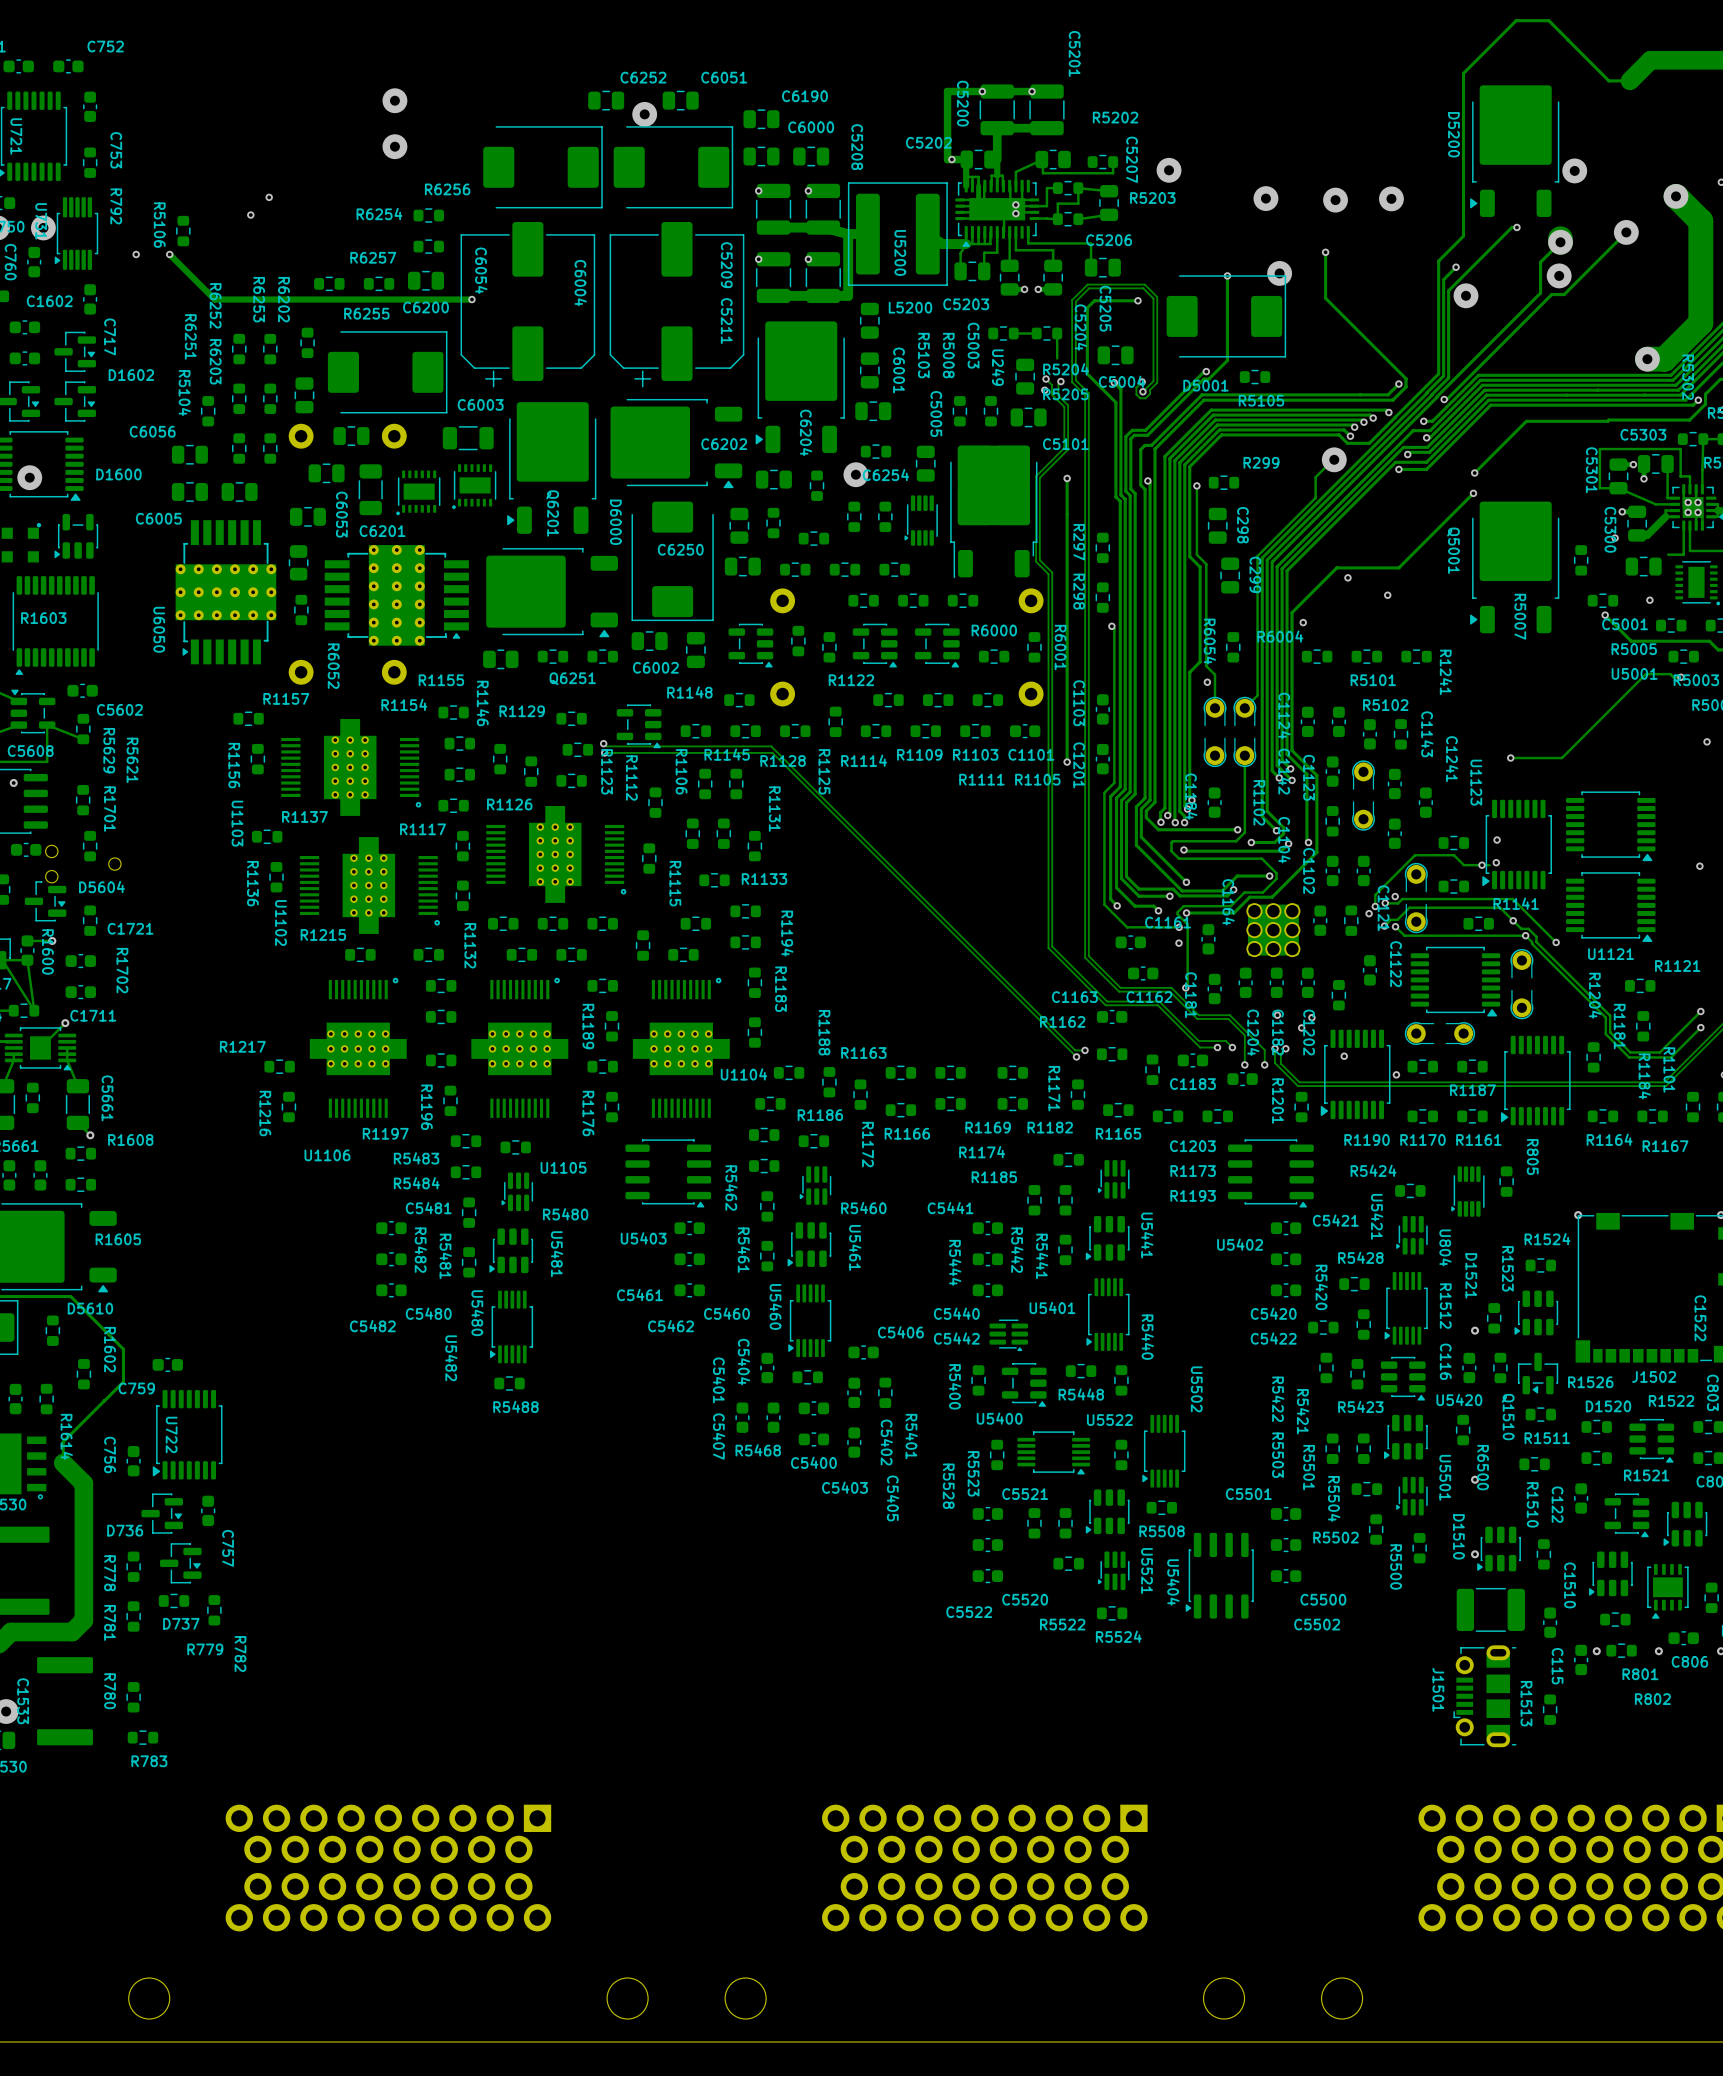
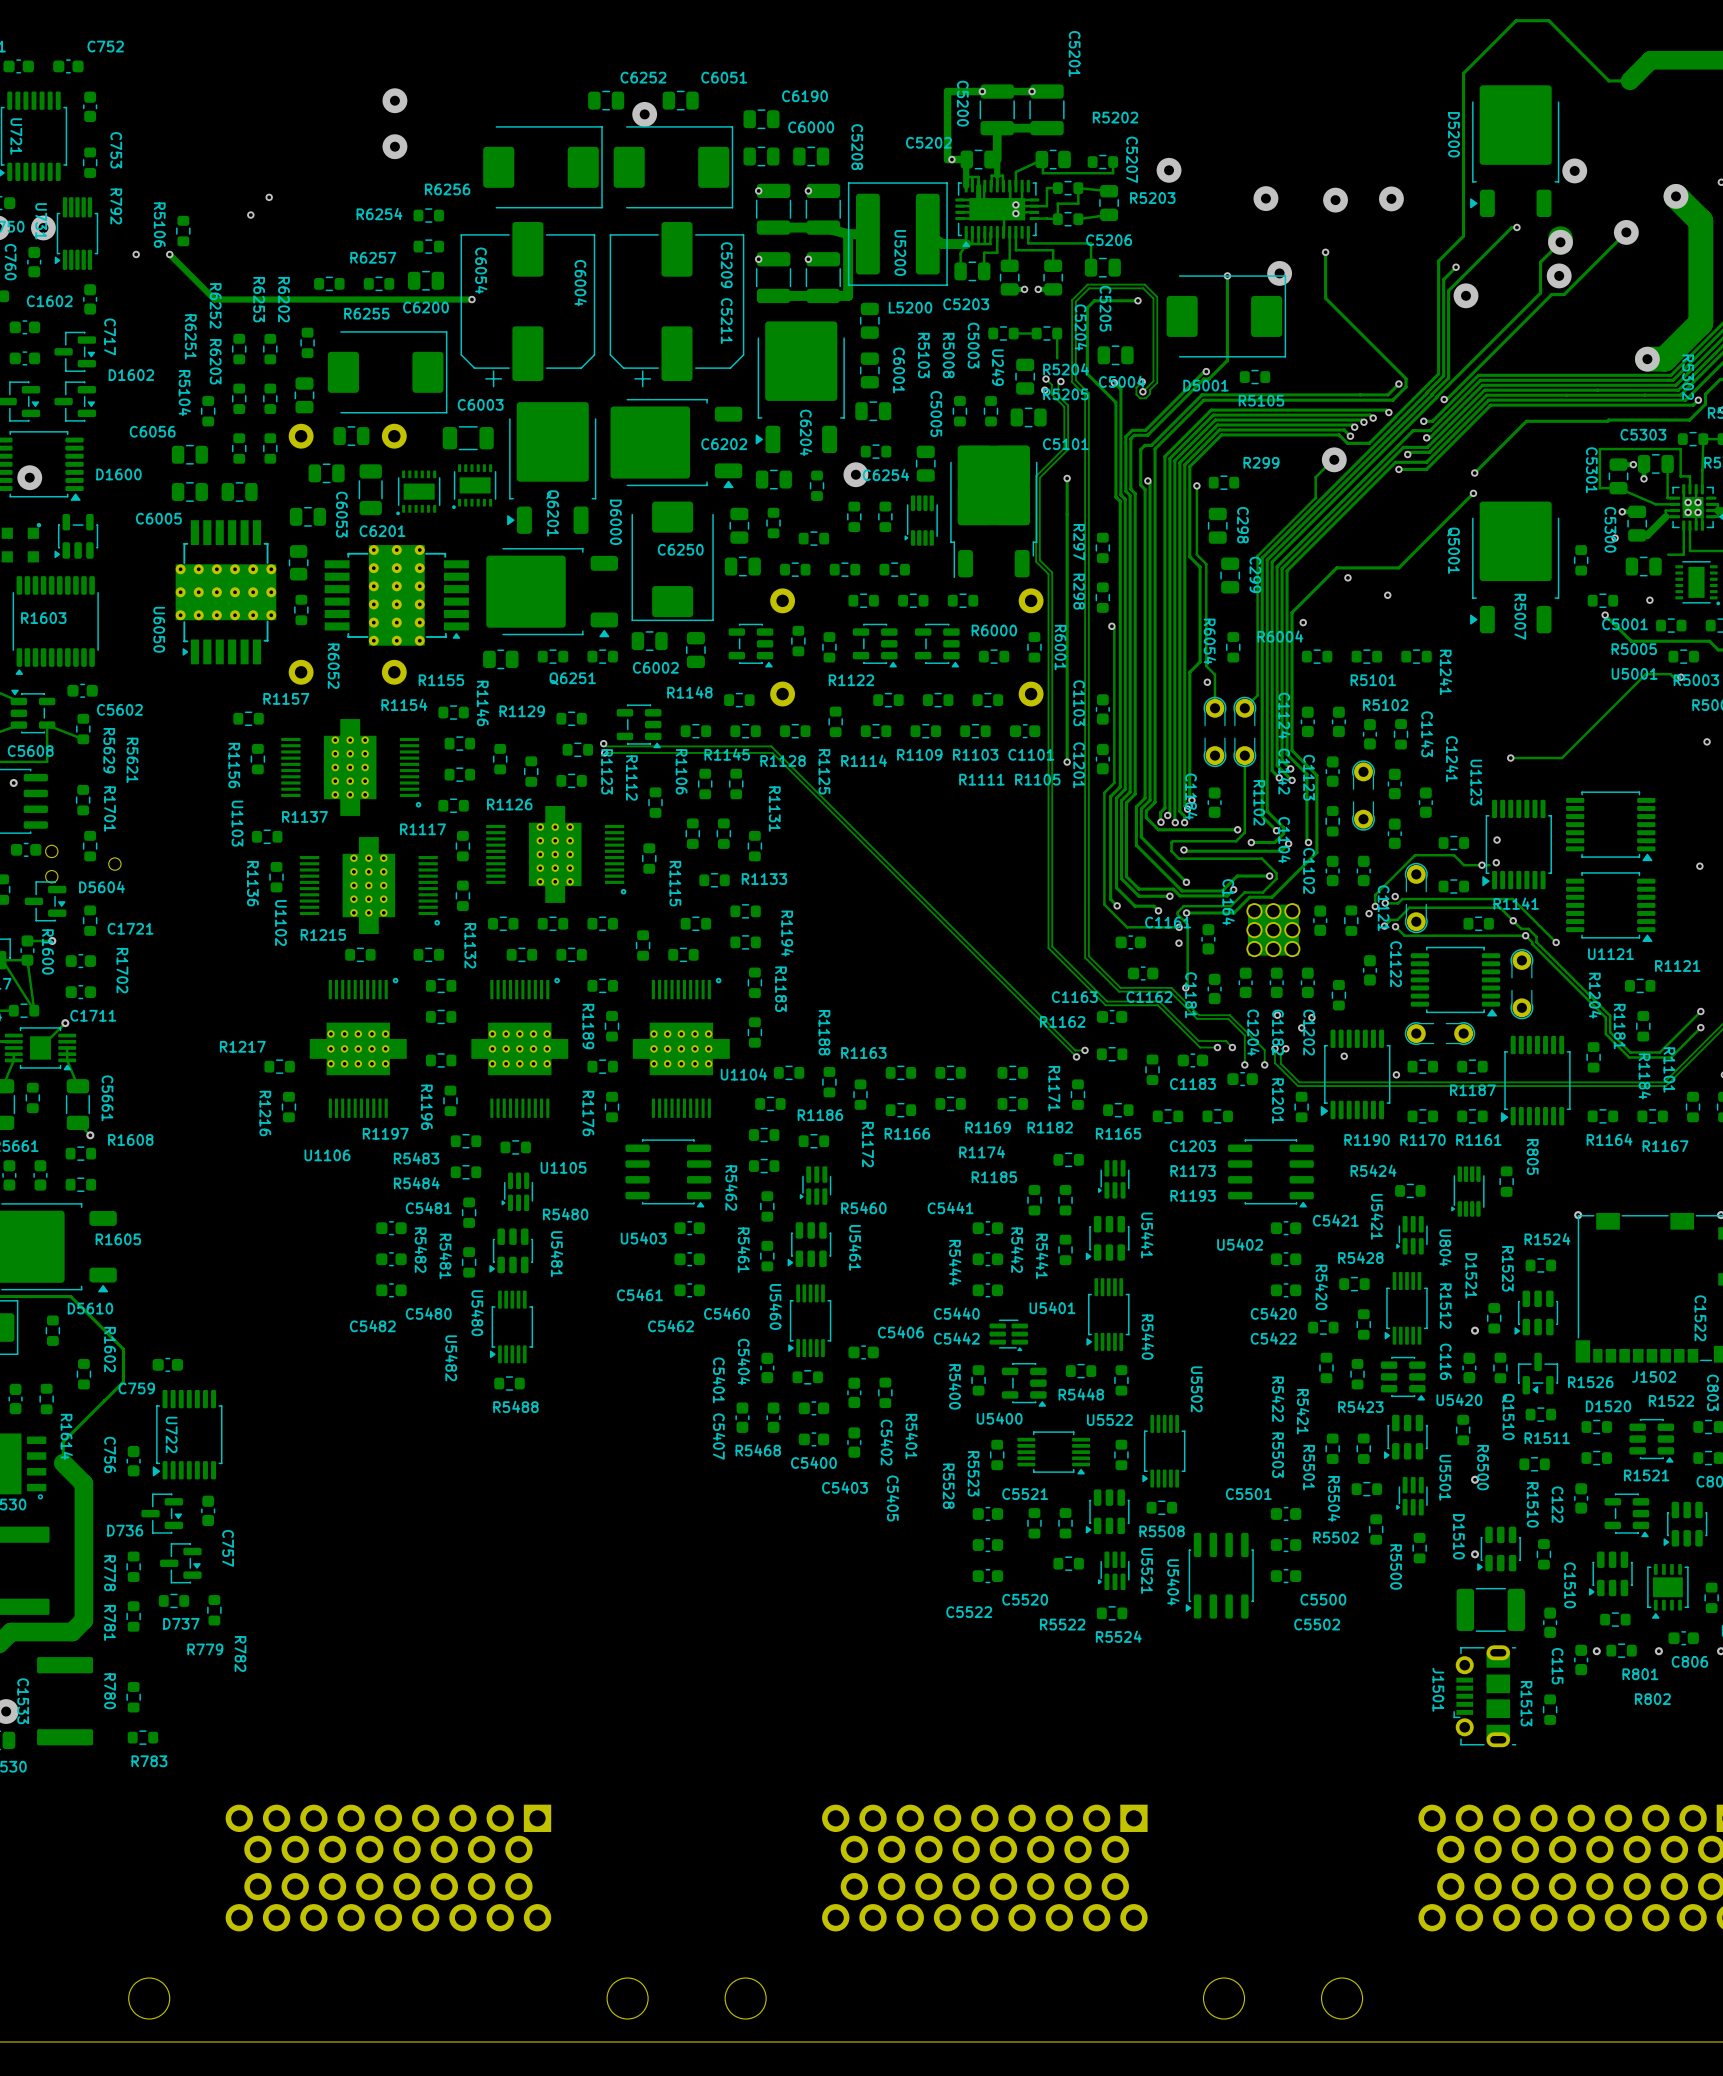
D5604 footprint: [24, 881, 67, 922] -> [24, 881, 67, 922]

